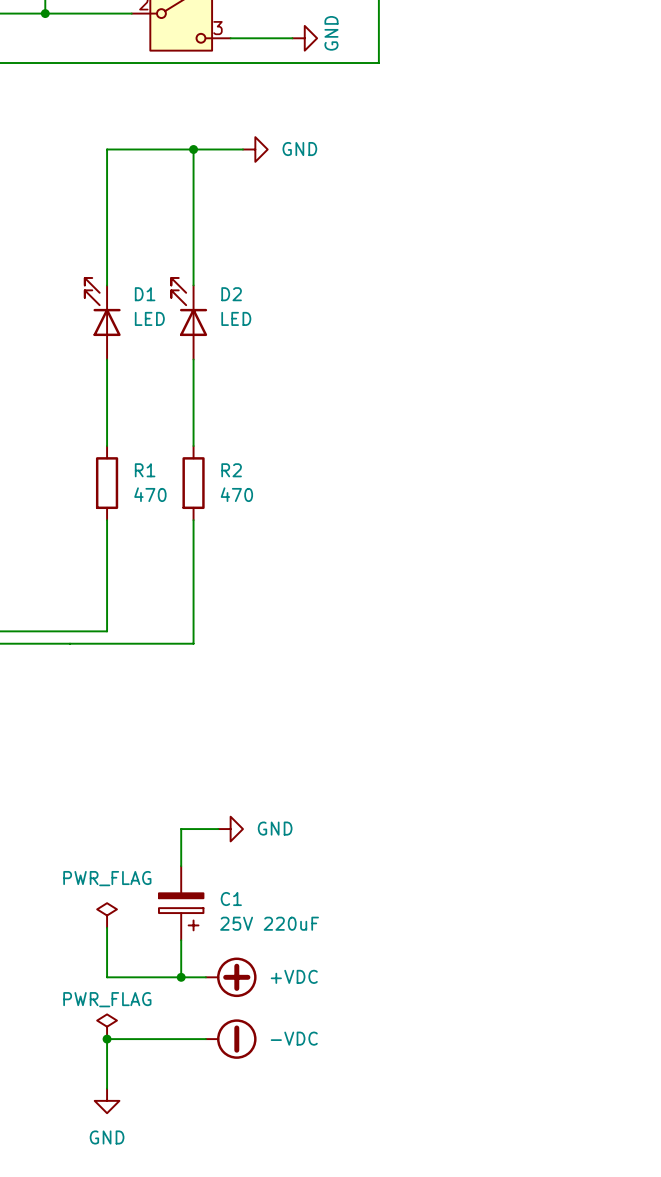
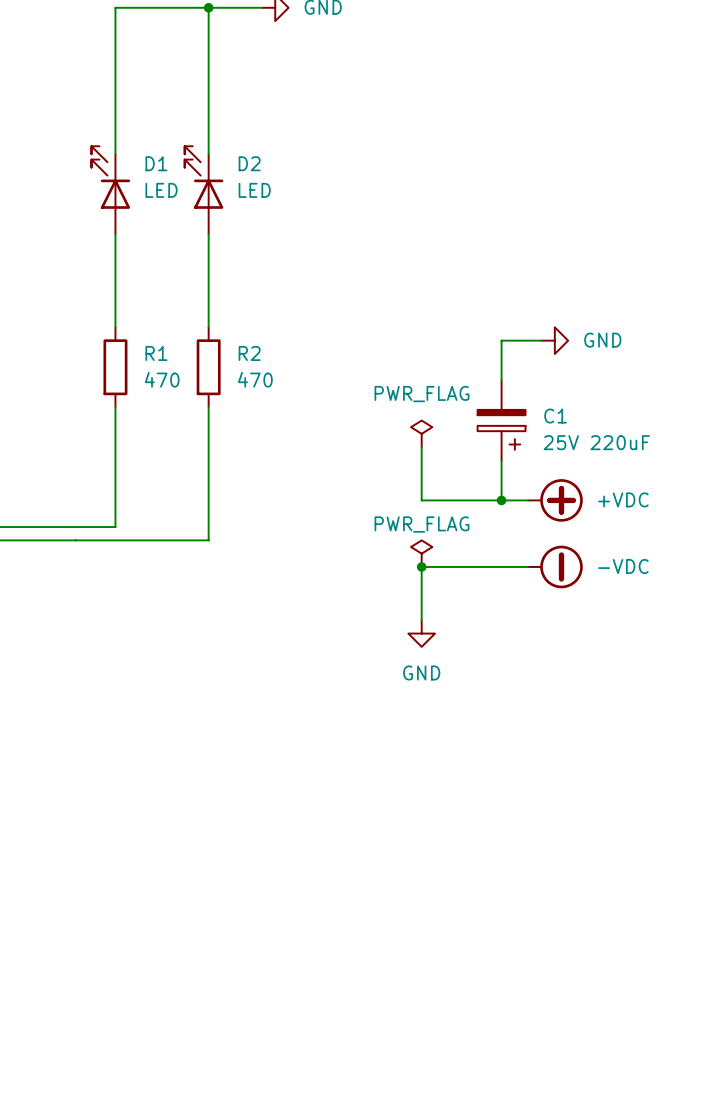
wire: none -> (541, 340) (501, 340) (501, 380)
power symbol: none -> GND (554, 340)
power symbol: none -> PWR_FLAG (421, 433)
wire: none -> (421, 447) (421, 500) (528, 500)
wire: none -> (501, 460) (501, 500)
junction: none -> (501, 500)
power symbol: none -> +VDC (555, 500)
power symbol: none -> PWR_FLAG (421, 553)
junction: none -> (421, 566)
wire: none -> (528, 566) (421, 566) (421, 620)
power symbol: none -> -VDC (555, 566)
wire: (218, 829) (181, 829) (181, 866) -> none
power symbol rotation: 0° (230, 829) -> 90° clockwise (421, 633)
power symbol position: GND (230, 829) -> GND (421, 633)
C1 position: (181, 903) -> (501, 420)
power symbol: PWR_FLAG (107, 915) -> none
wire: (107, 927) (107, 977) (205, 977) -> none
wire: (181, 940) (181, 977) -> none
junction: (181, 977) -> none
power symbol: +VDC (231, 977) -> none
power symbol: PWR_FLAG (107, 1026) -> none
junction: (107, 1039) -> none
wire: (205, 1039) (107, 1039) (107, 1088) -> none
power symbol: -VDC (231, 1039) -> none
power symbol: GND (107, 1100) -> none

